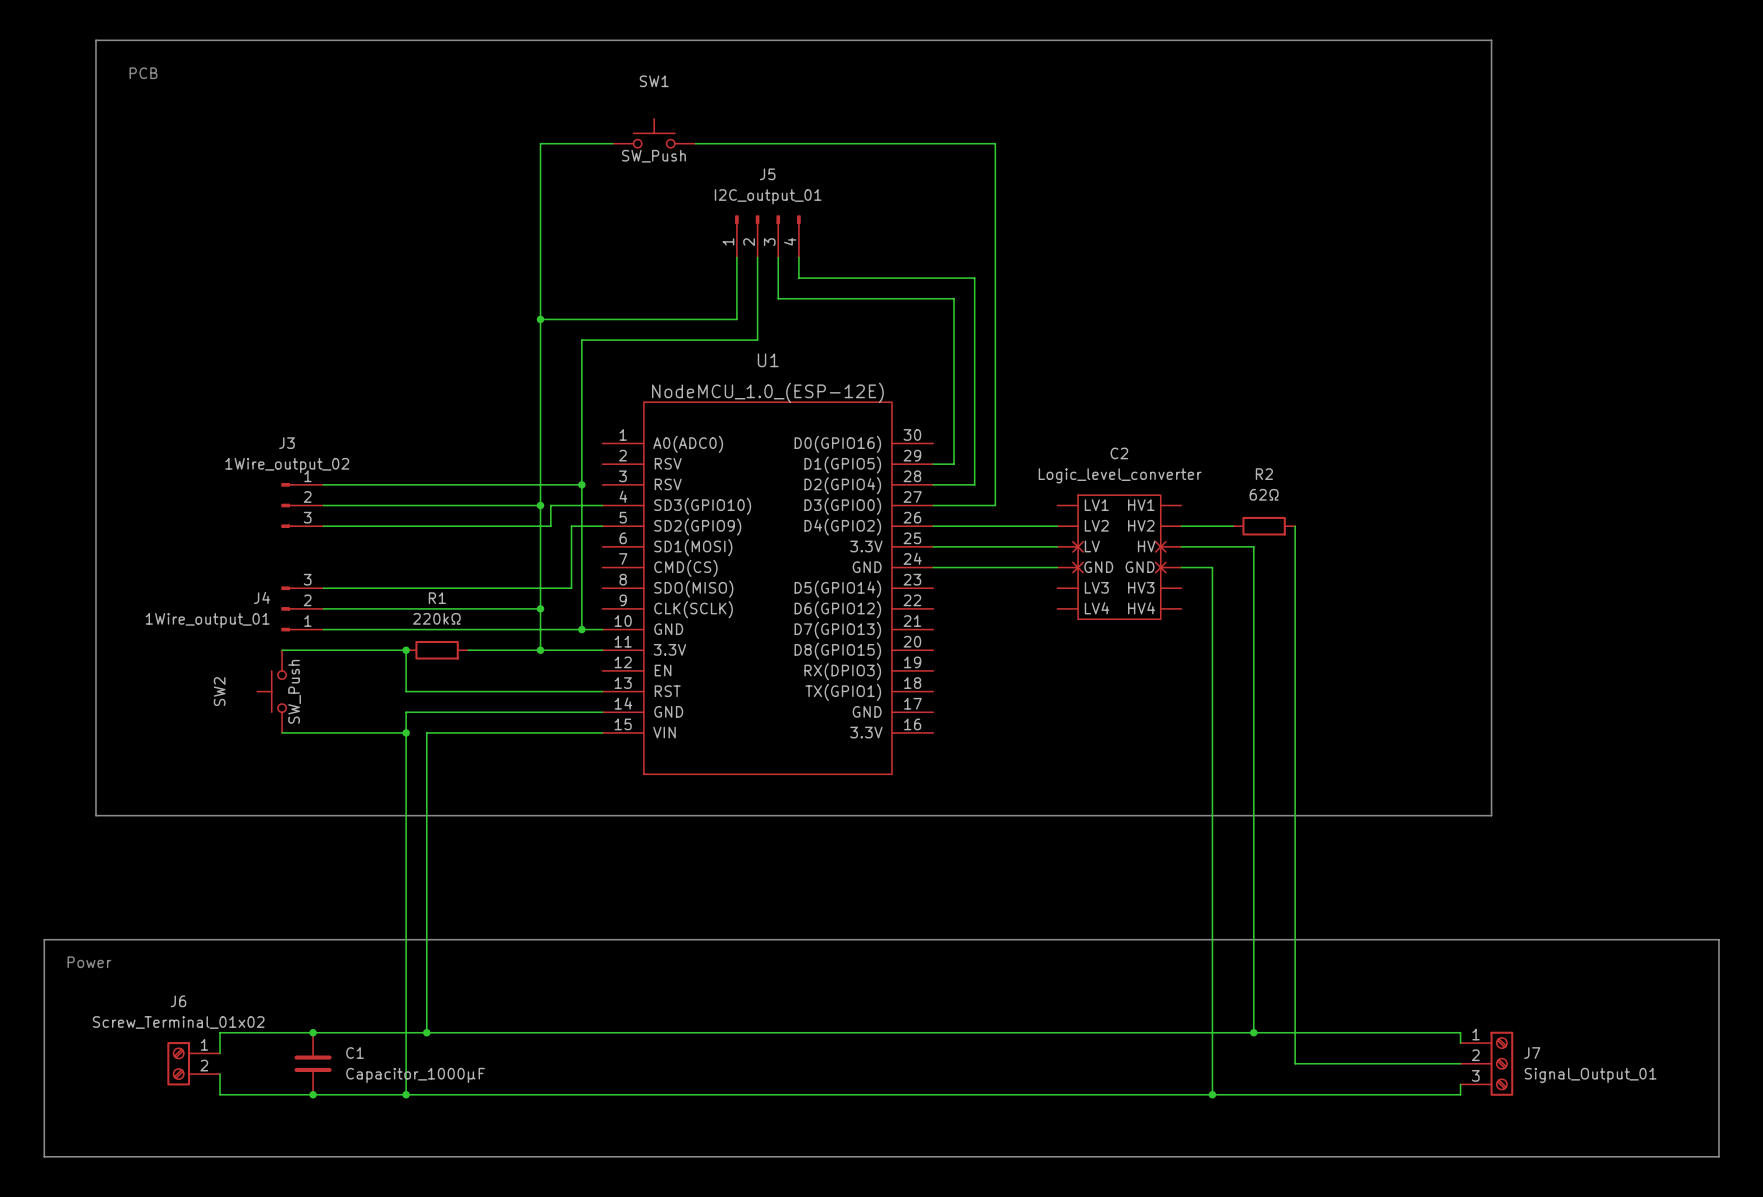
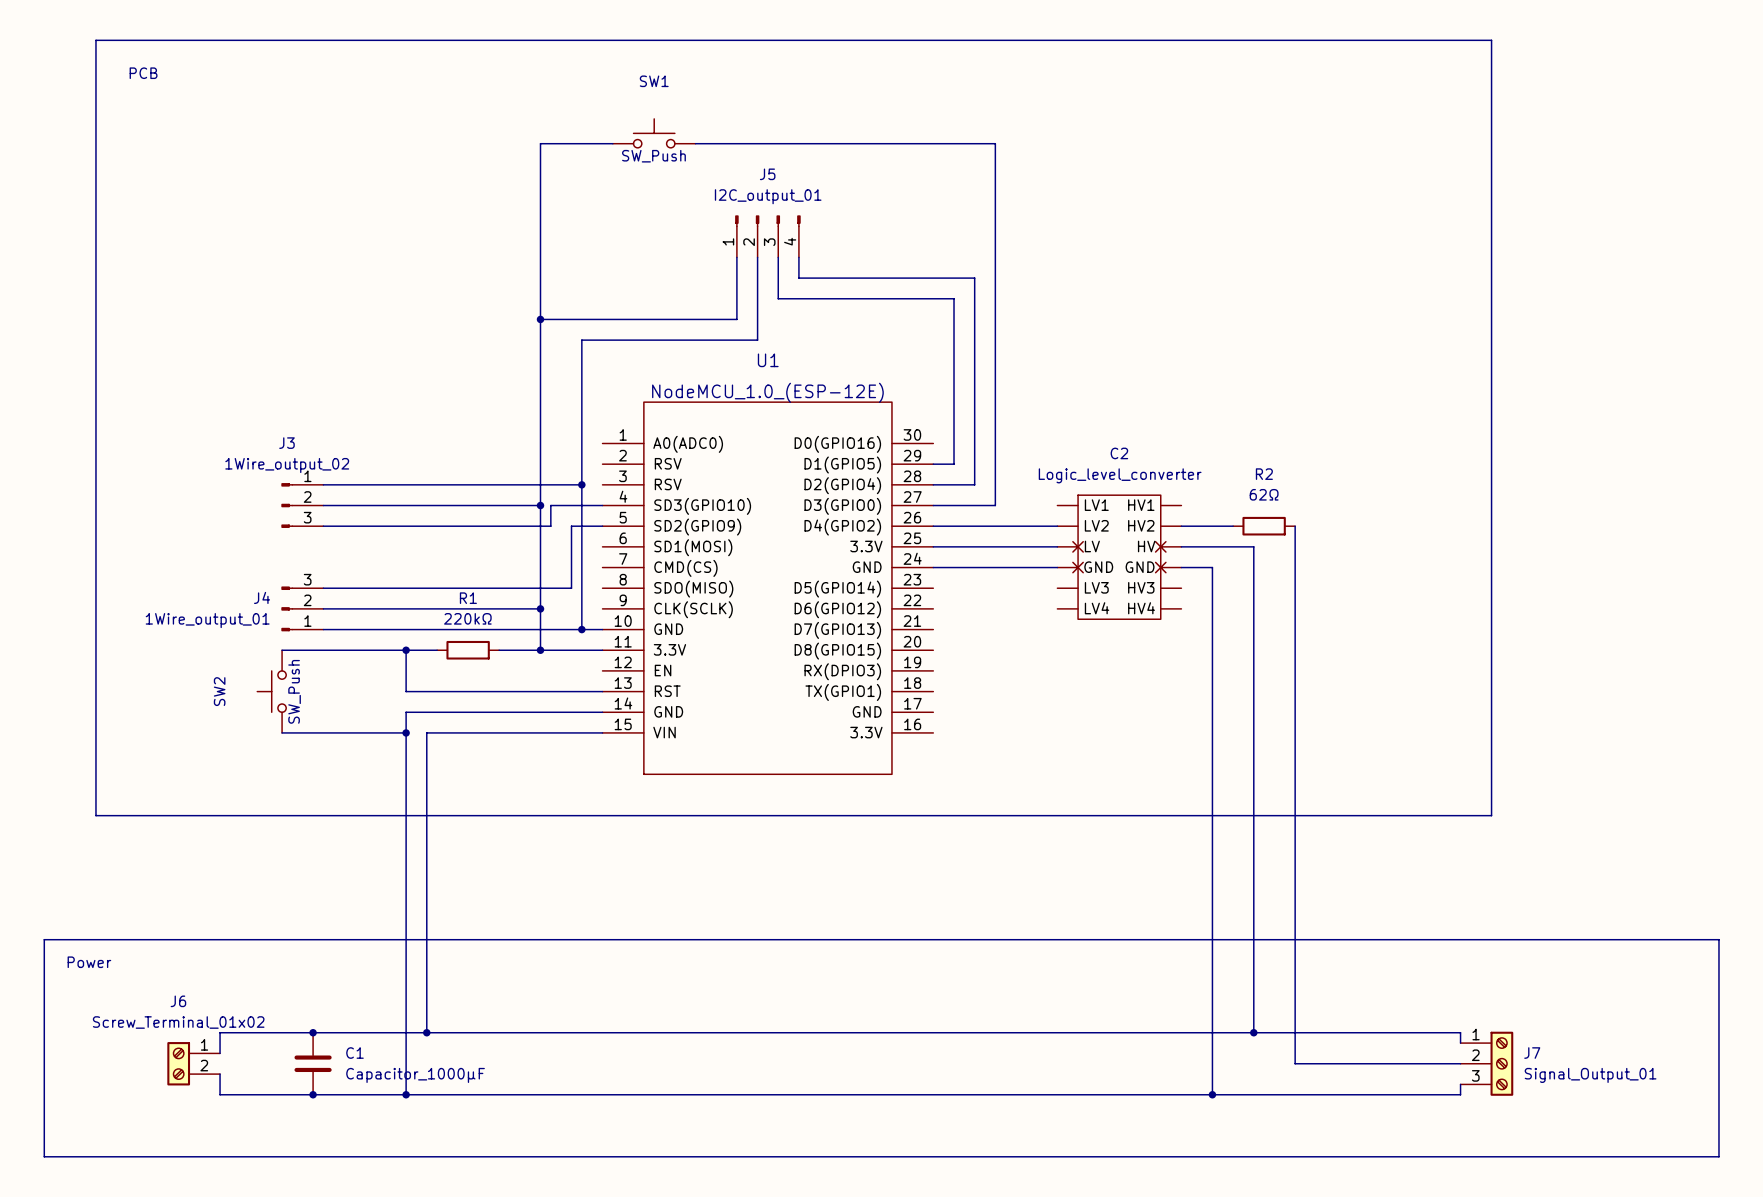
R1 position: (437, 650) -> (468, 650)
wire: (468, 650) (499, 650) -> (406, 650) (437, 650)

